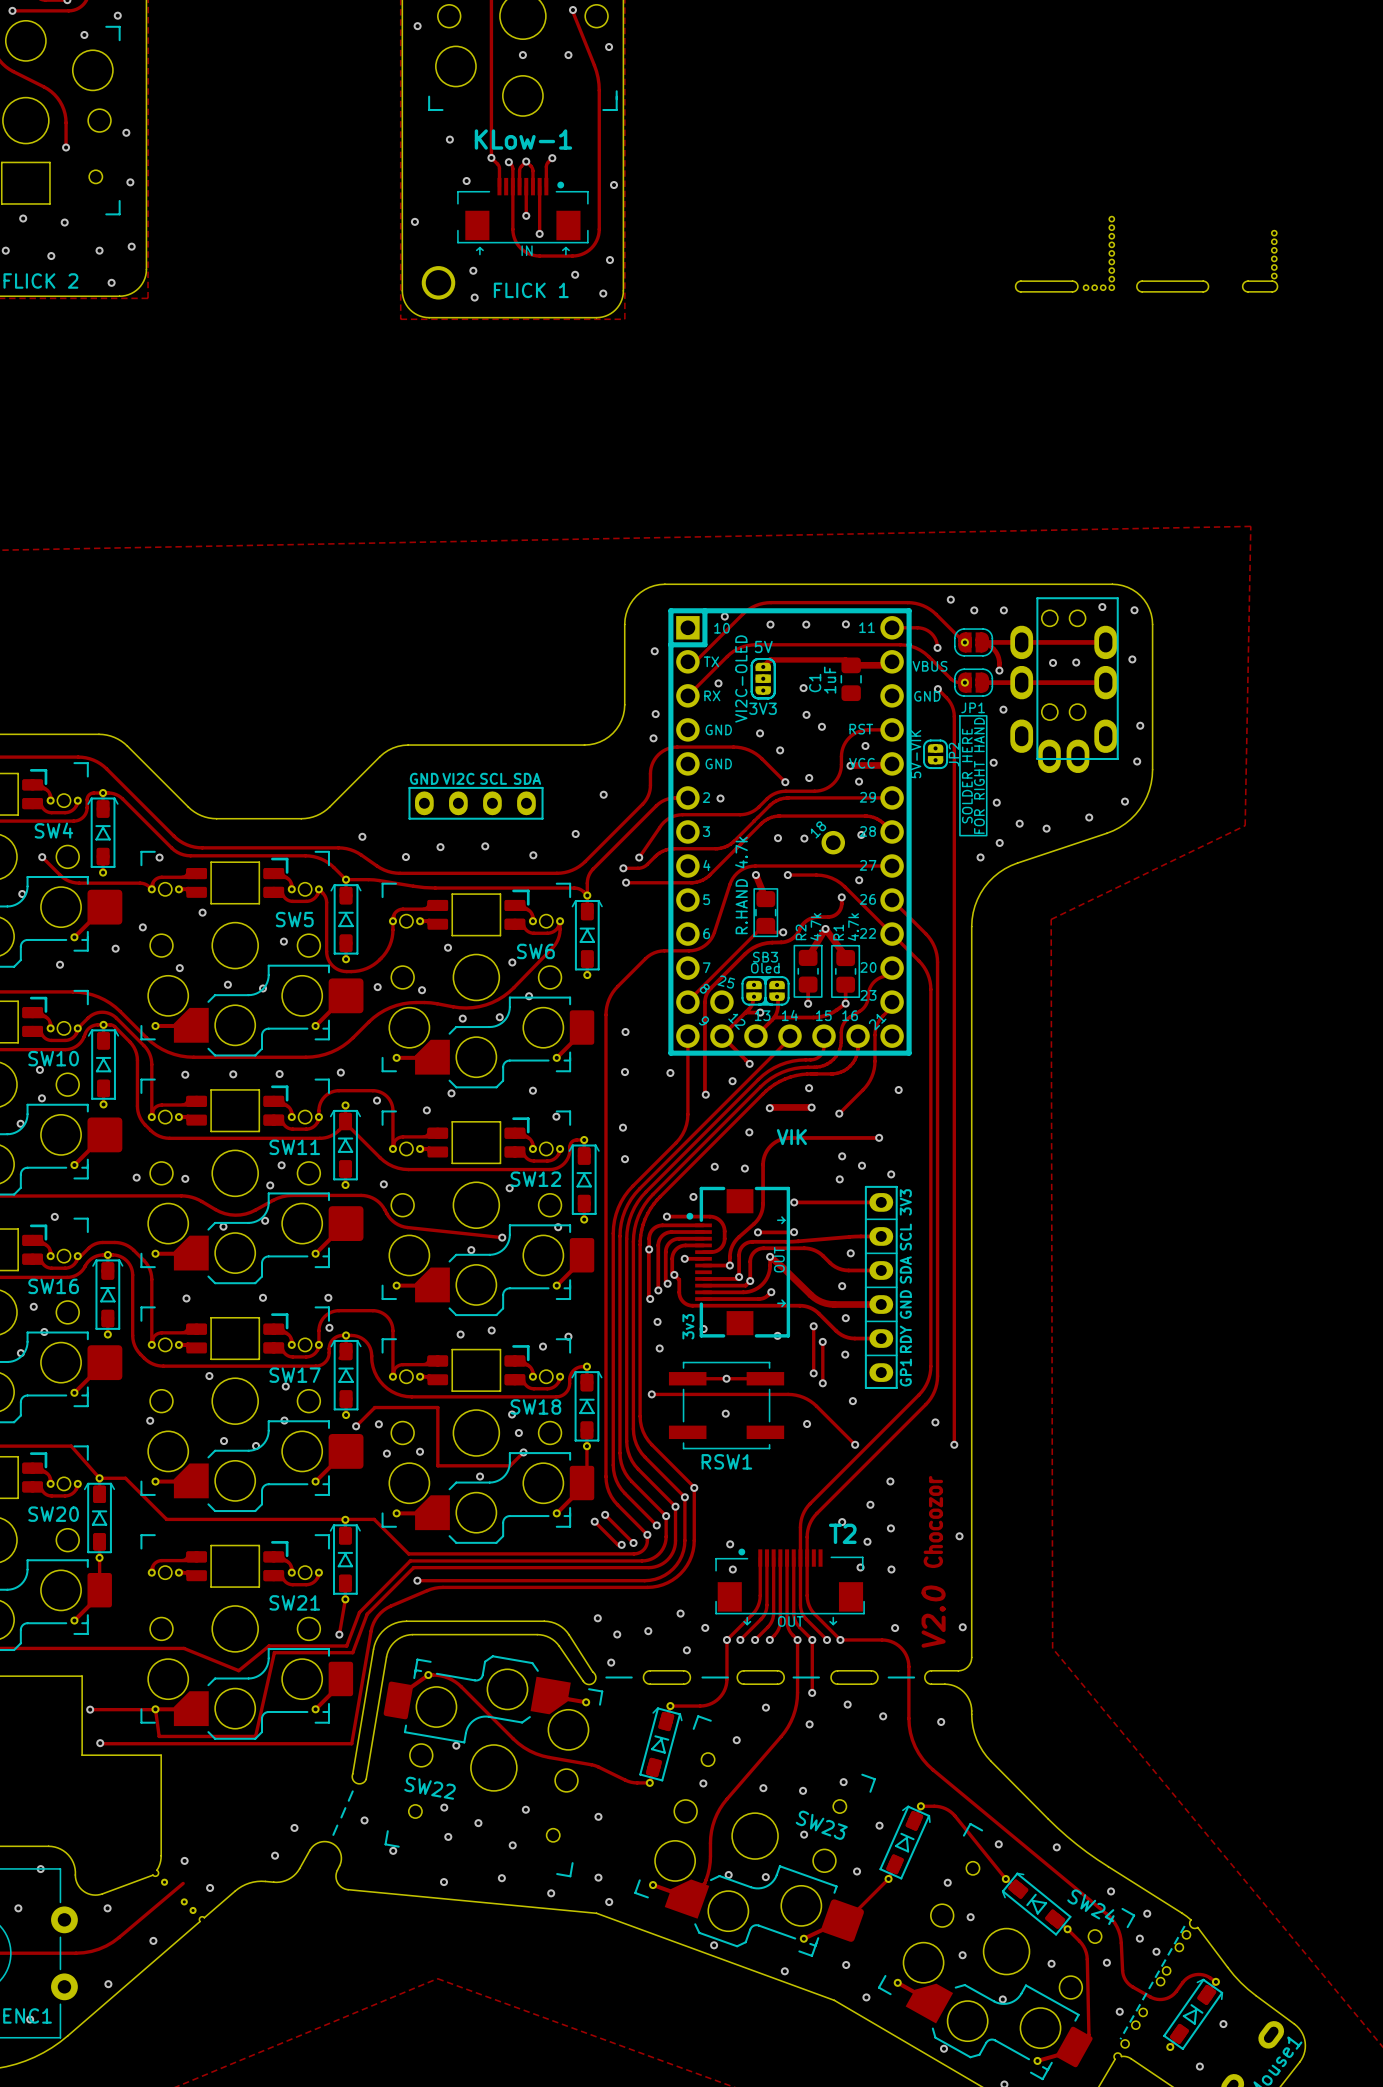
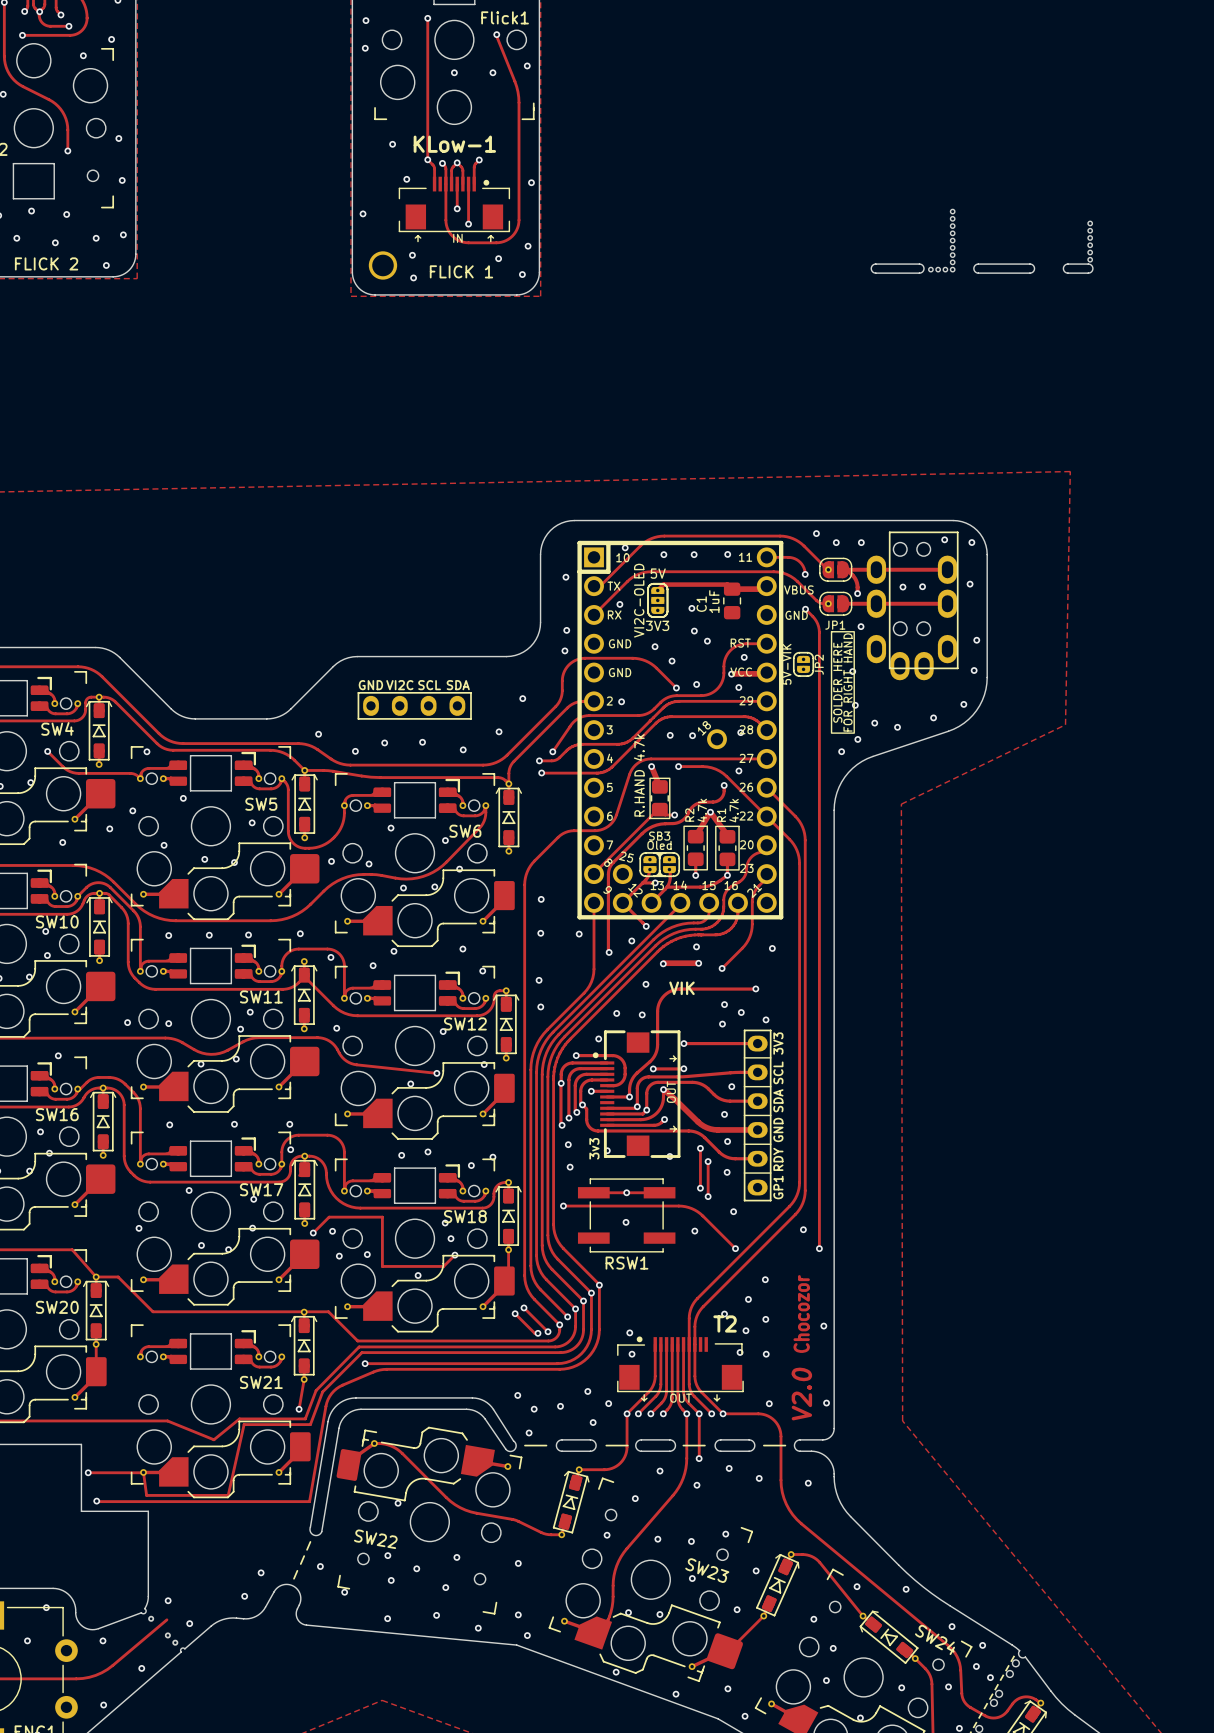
JP1 footprint: [954, 628, 994, 837] -> [819, 557, 855, 734]

